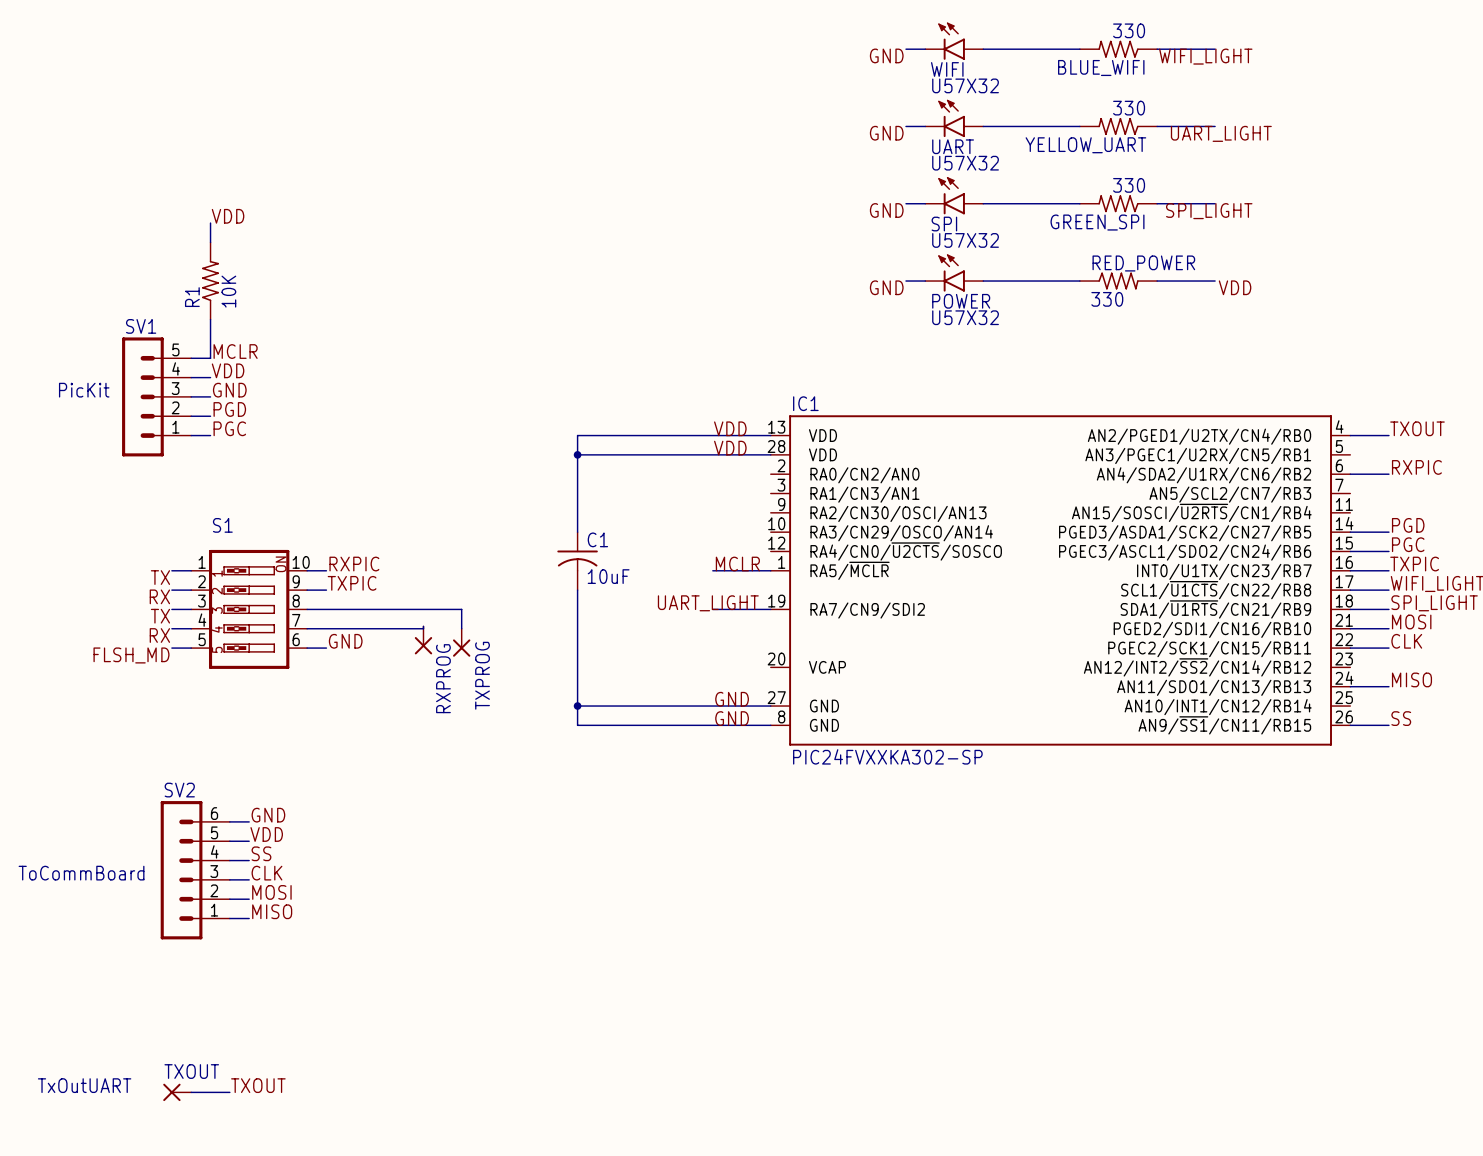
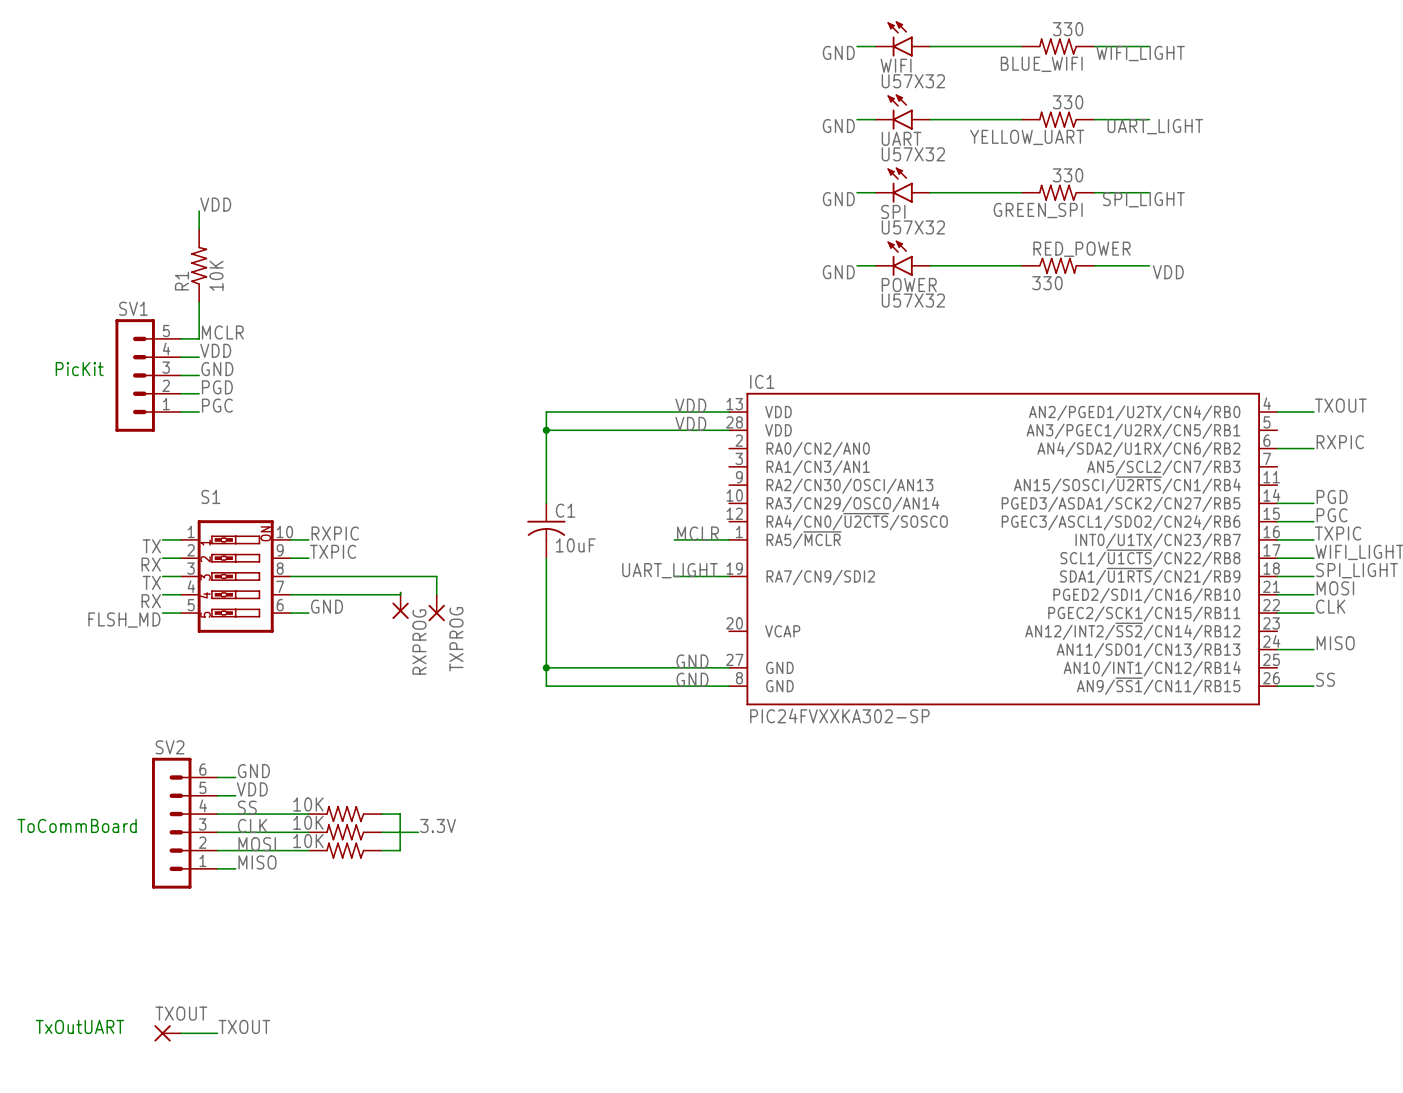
wire: none -> (235, 814) (308, 814)
part: none -> 10K (345, 814)
wire: none -> (381, 814) (400, 814) (400, 850) (381, 850)
label: none -> 3.3V (438, 825)
wire: none -> (235, 832) (308, 832)
part: none -> 10K (345, 832)
wire: none -> (381, 832) (418, 832)
wire: none -> (235, 850) (308, 850)
part: none -> 10K (345, 850)

